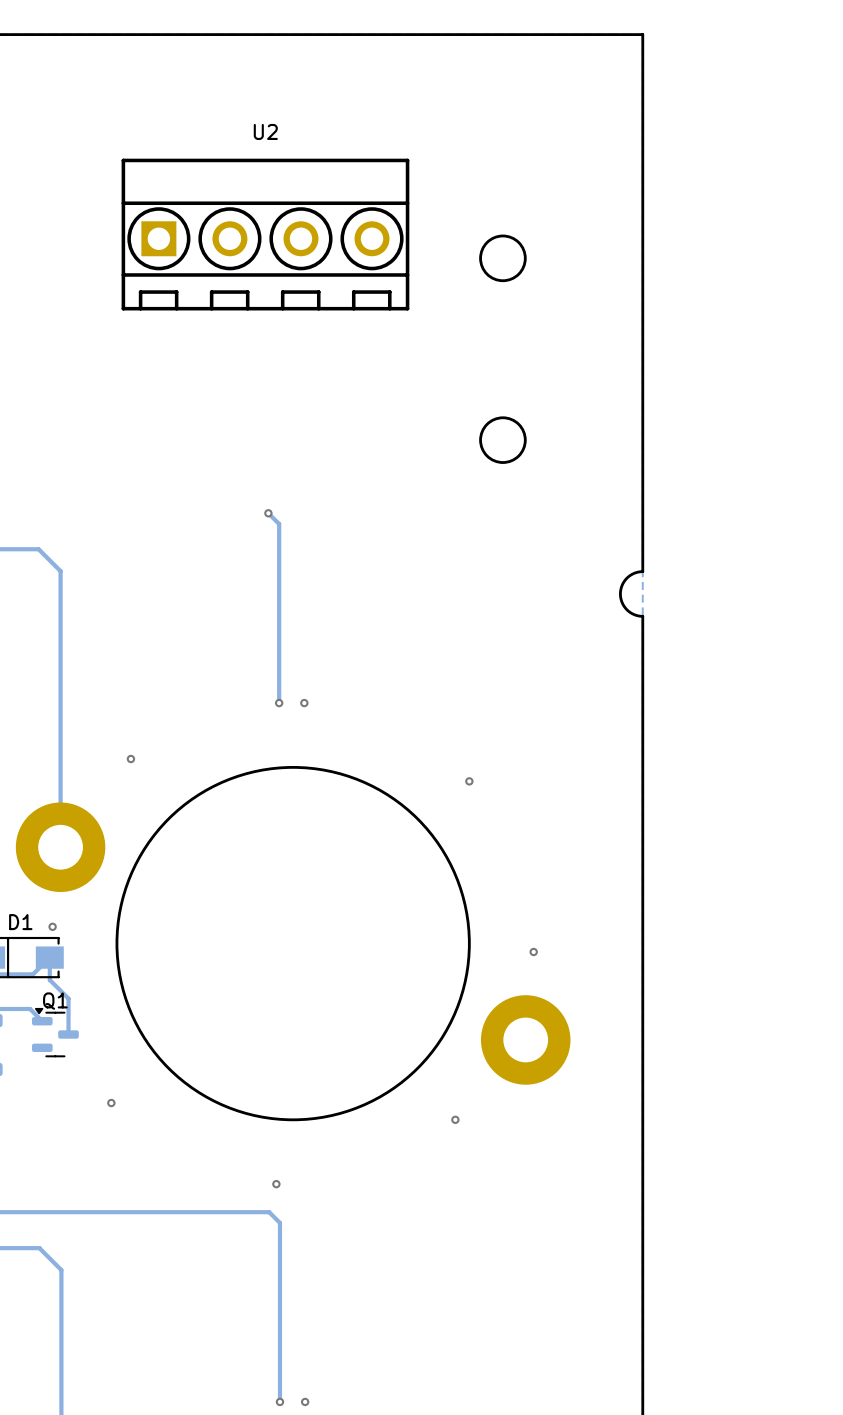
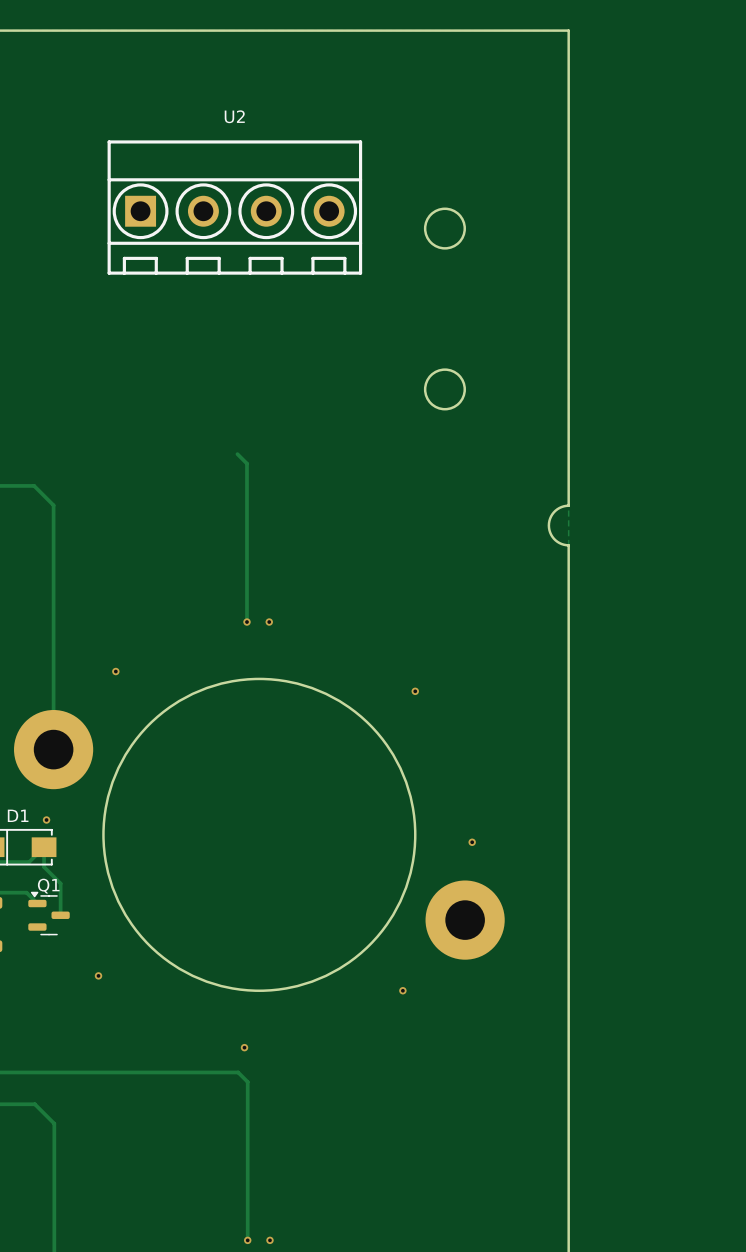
via: (268, 513) -> none

